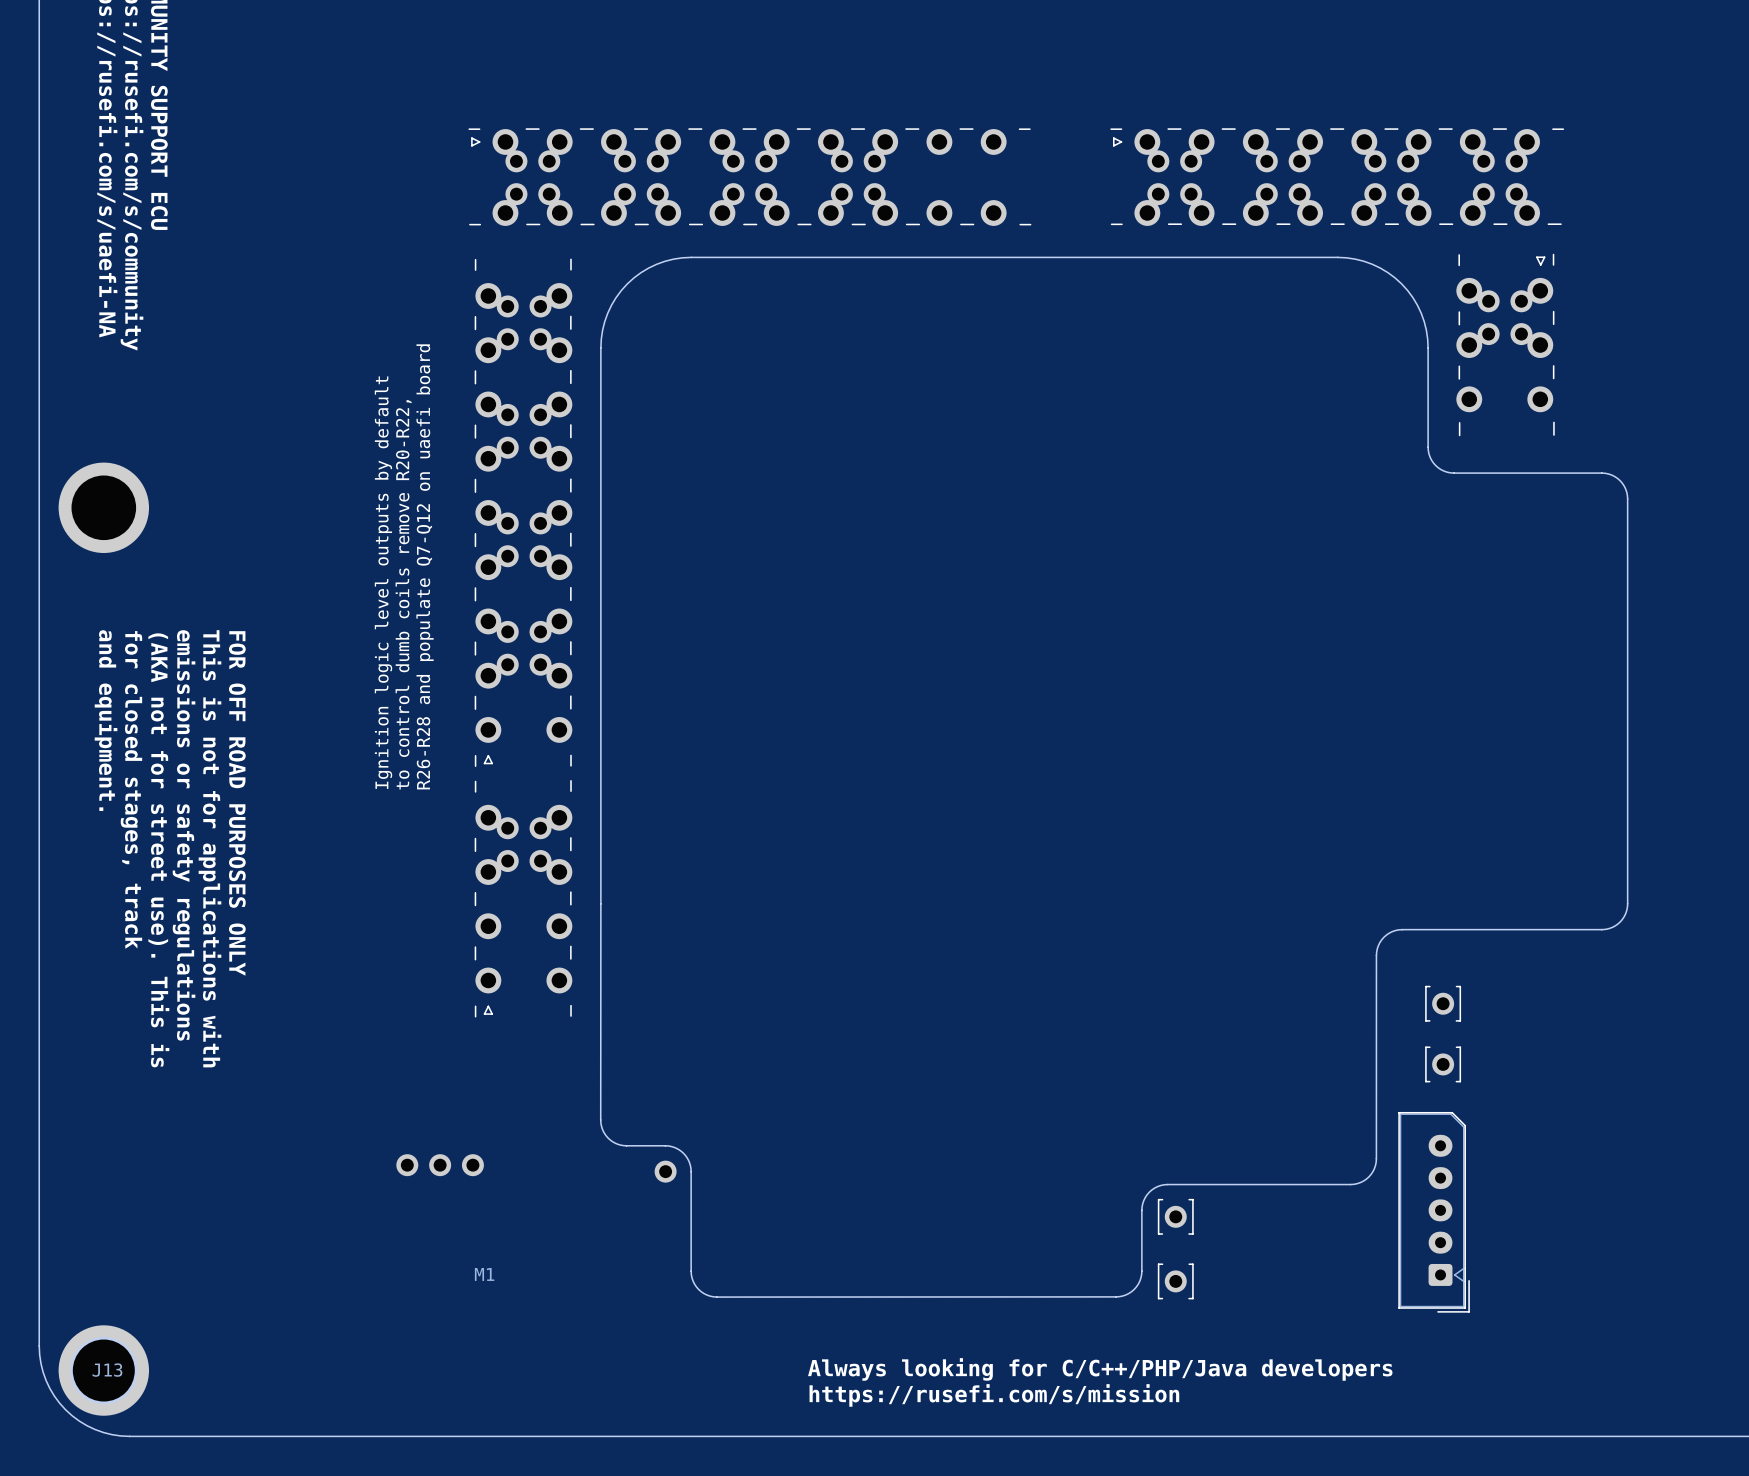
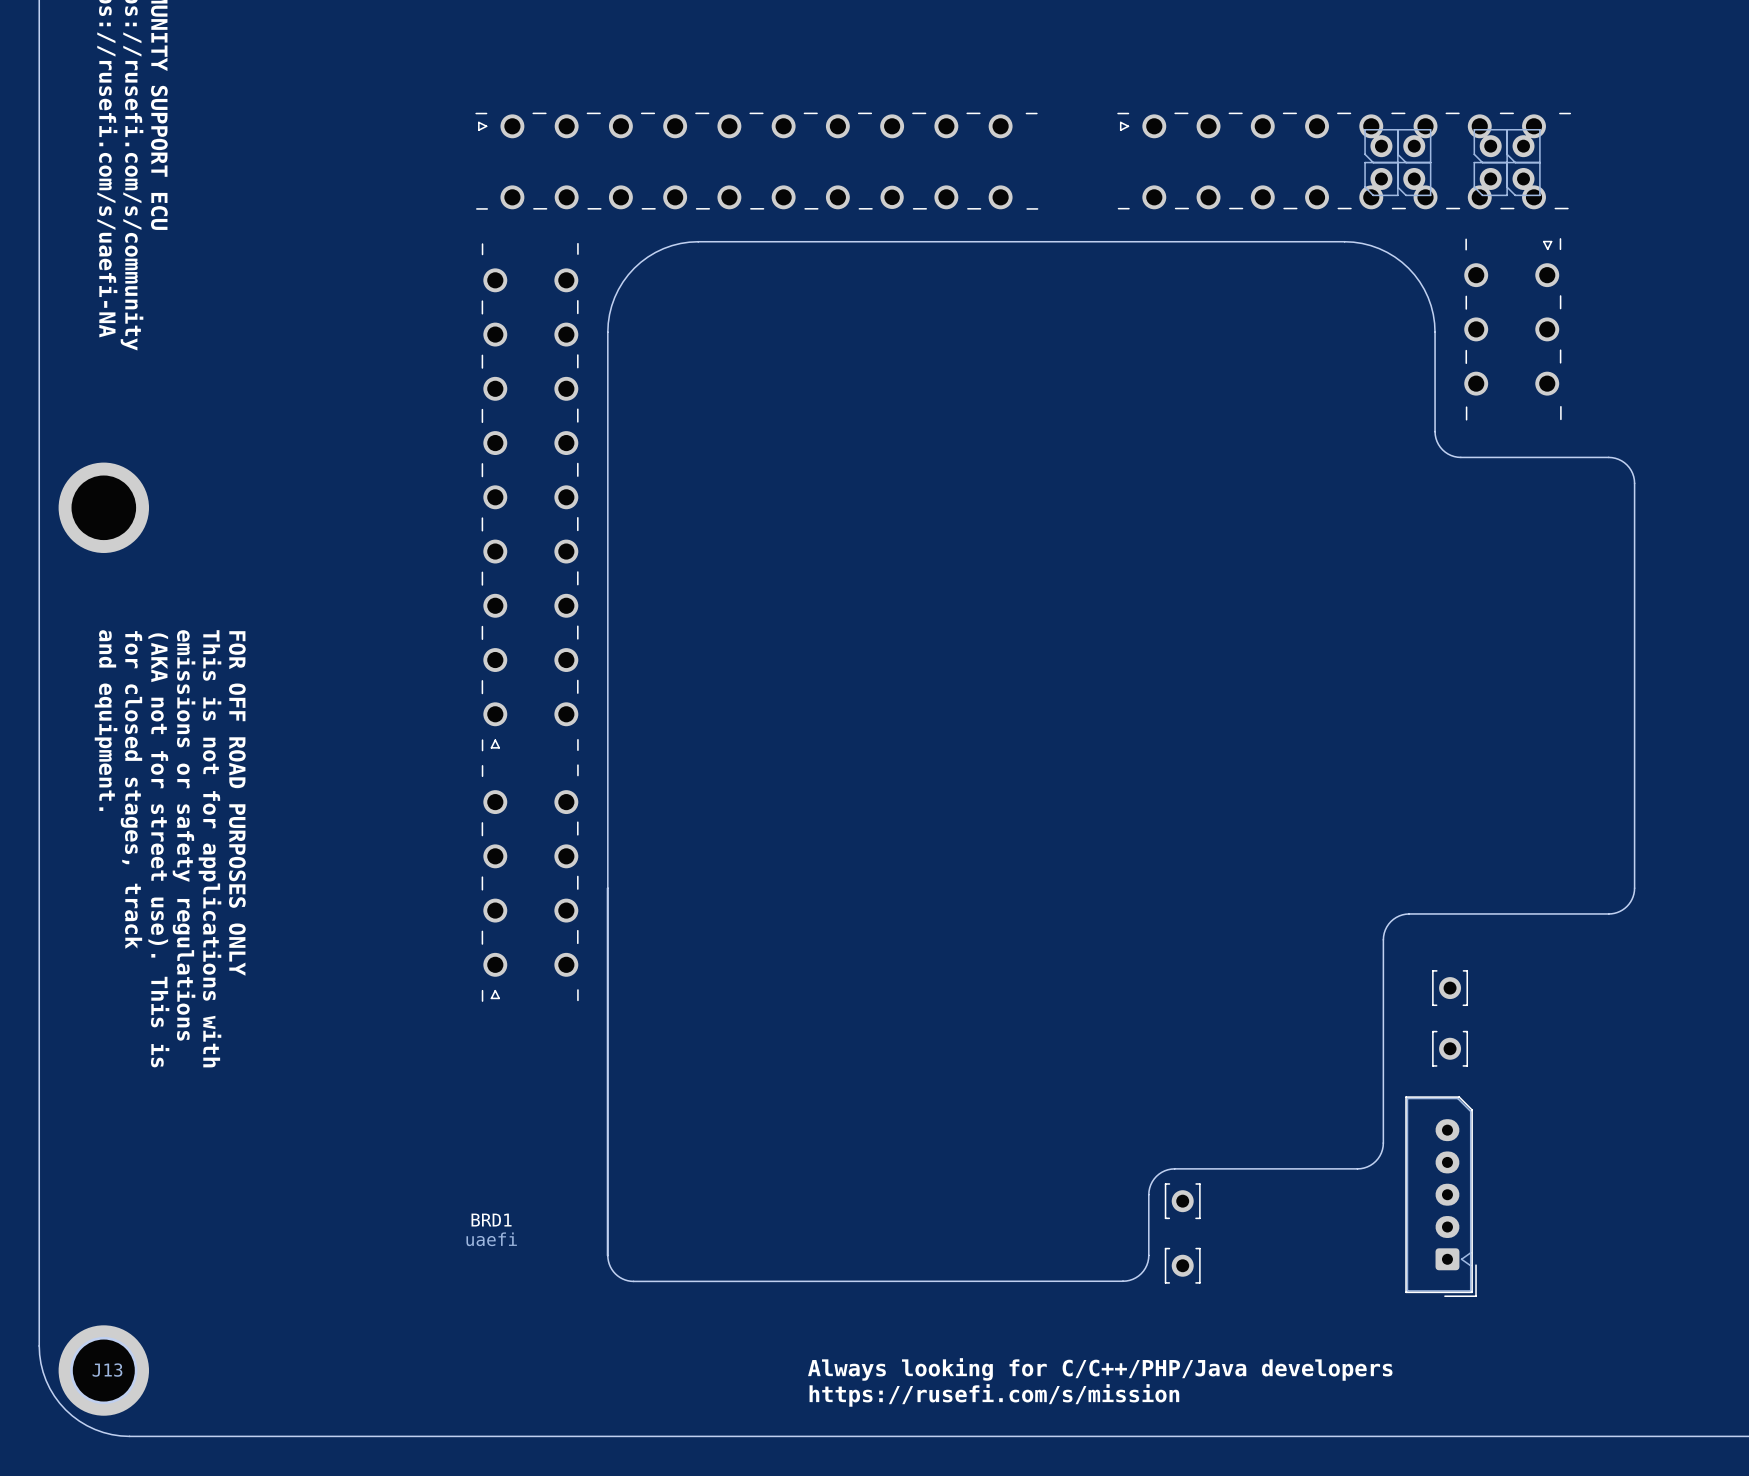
BRD1: none -> uaefi (1055, 704)
M1: (1012, 720) -> none

